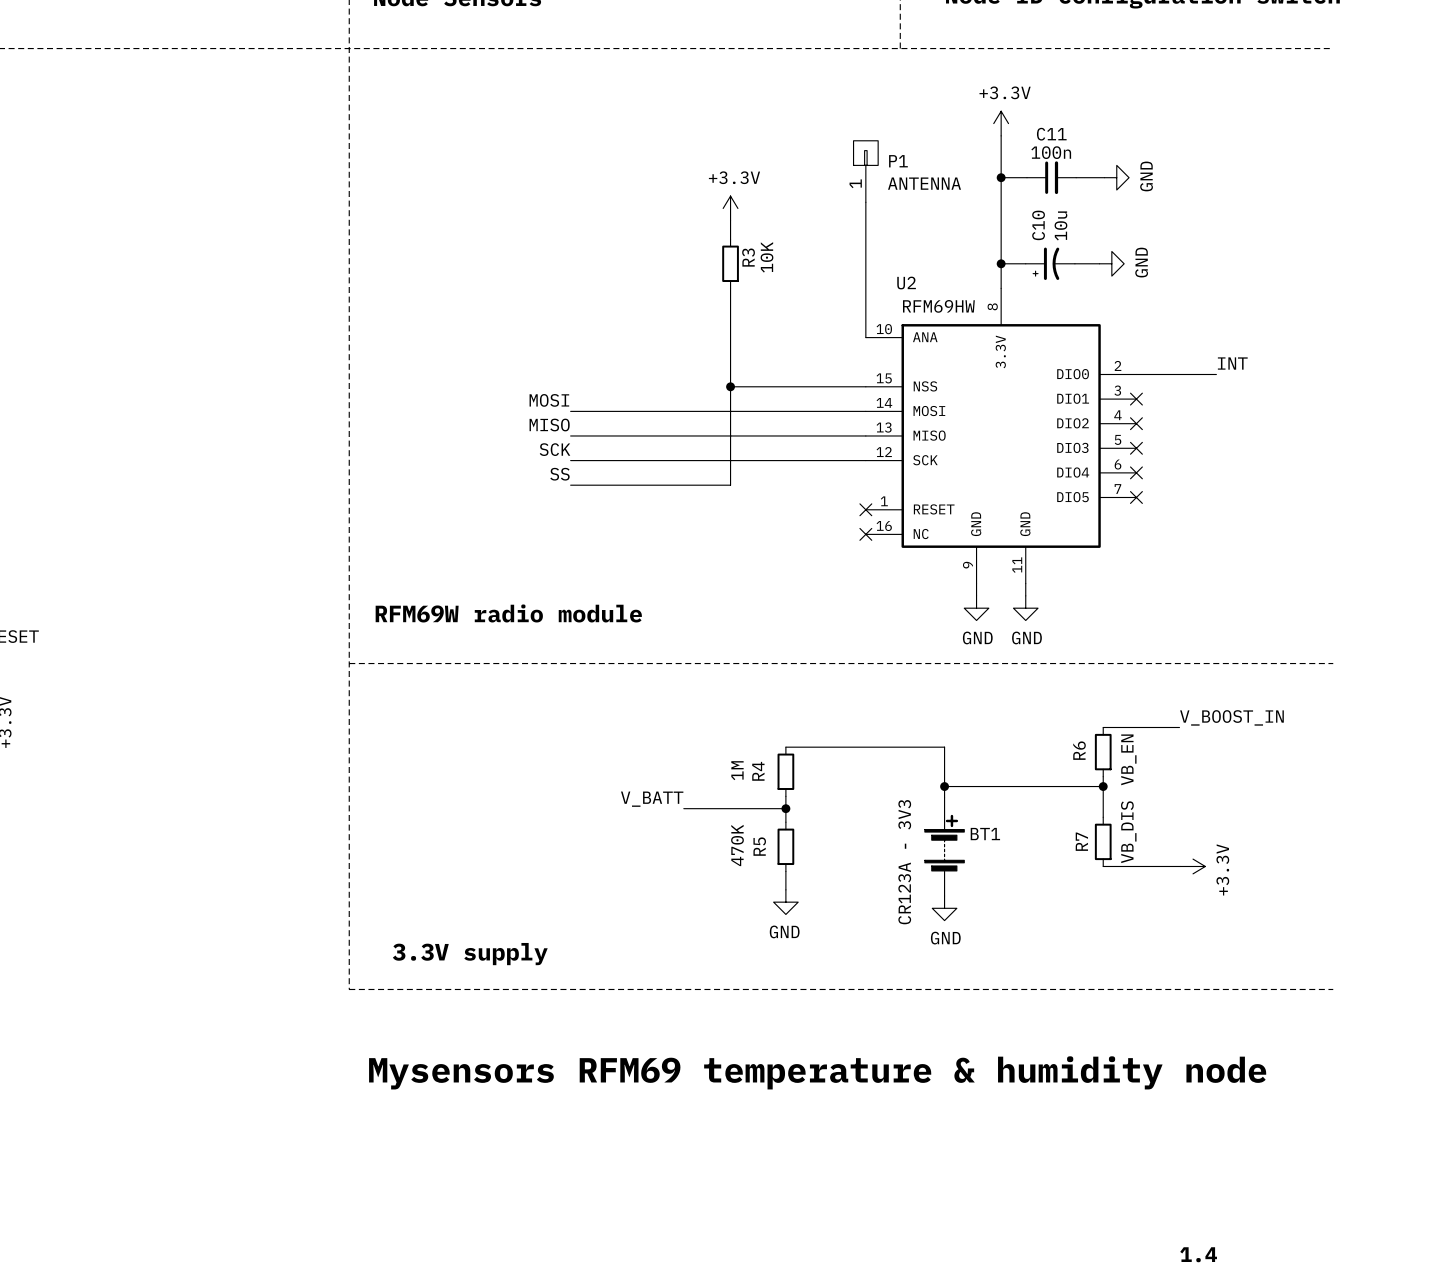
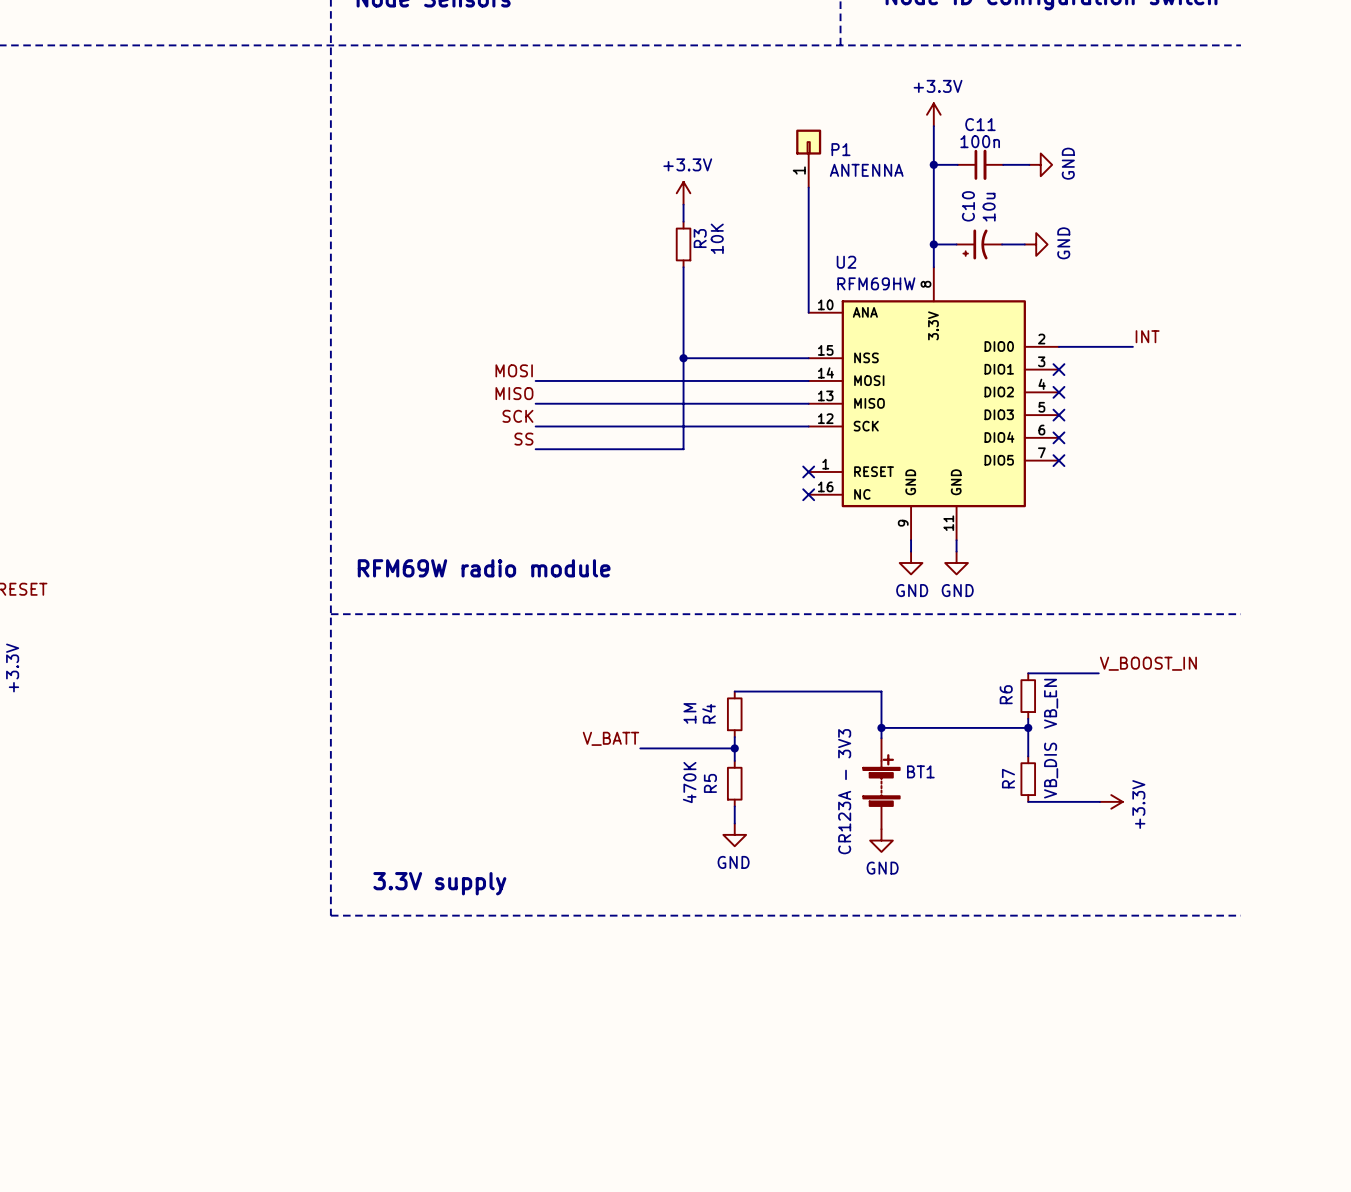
P1 symbol: [853, 140, 879, 203] -> [796, 129, 822, 188]
text: Mysensors RFM69 temperature & humidity node (817, 1072) -> none
text: 1.4 (1198, 1254) -> none

